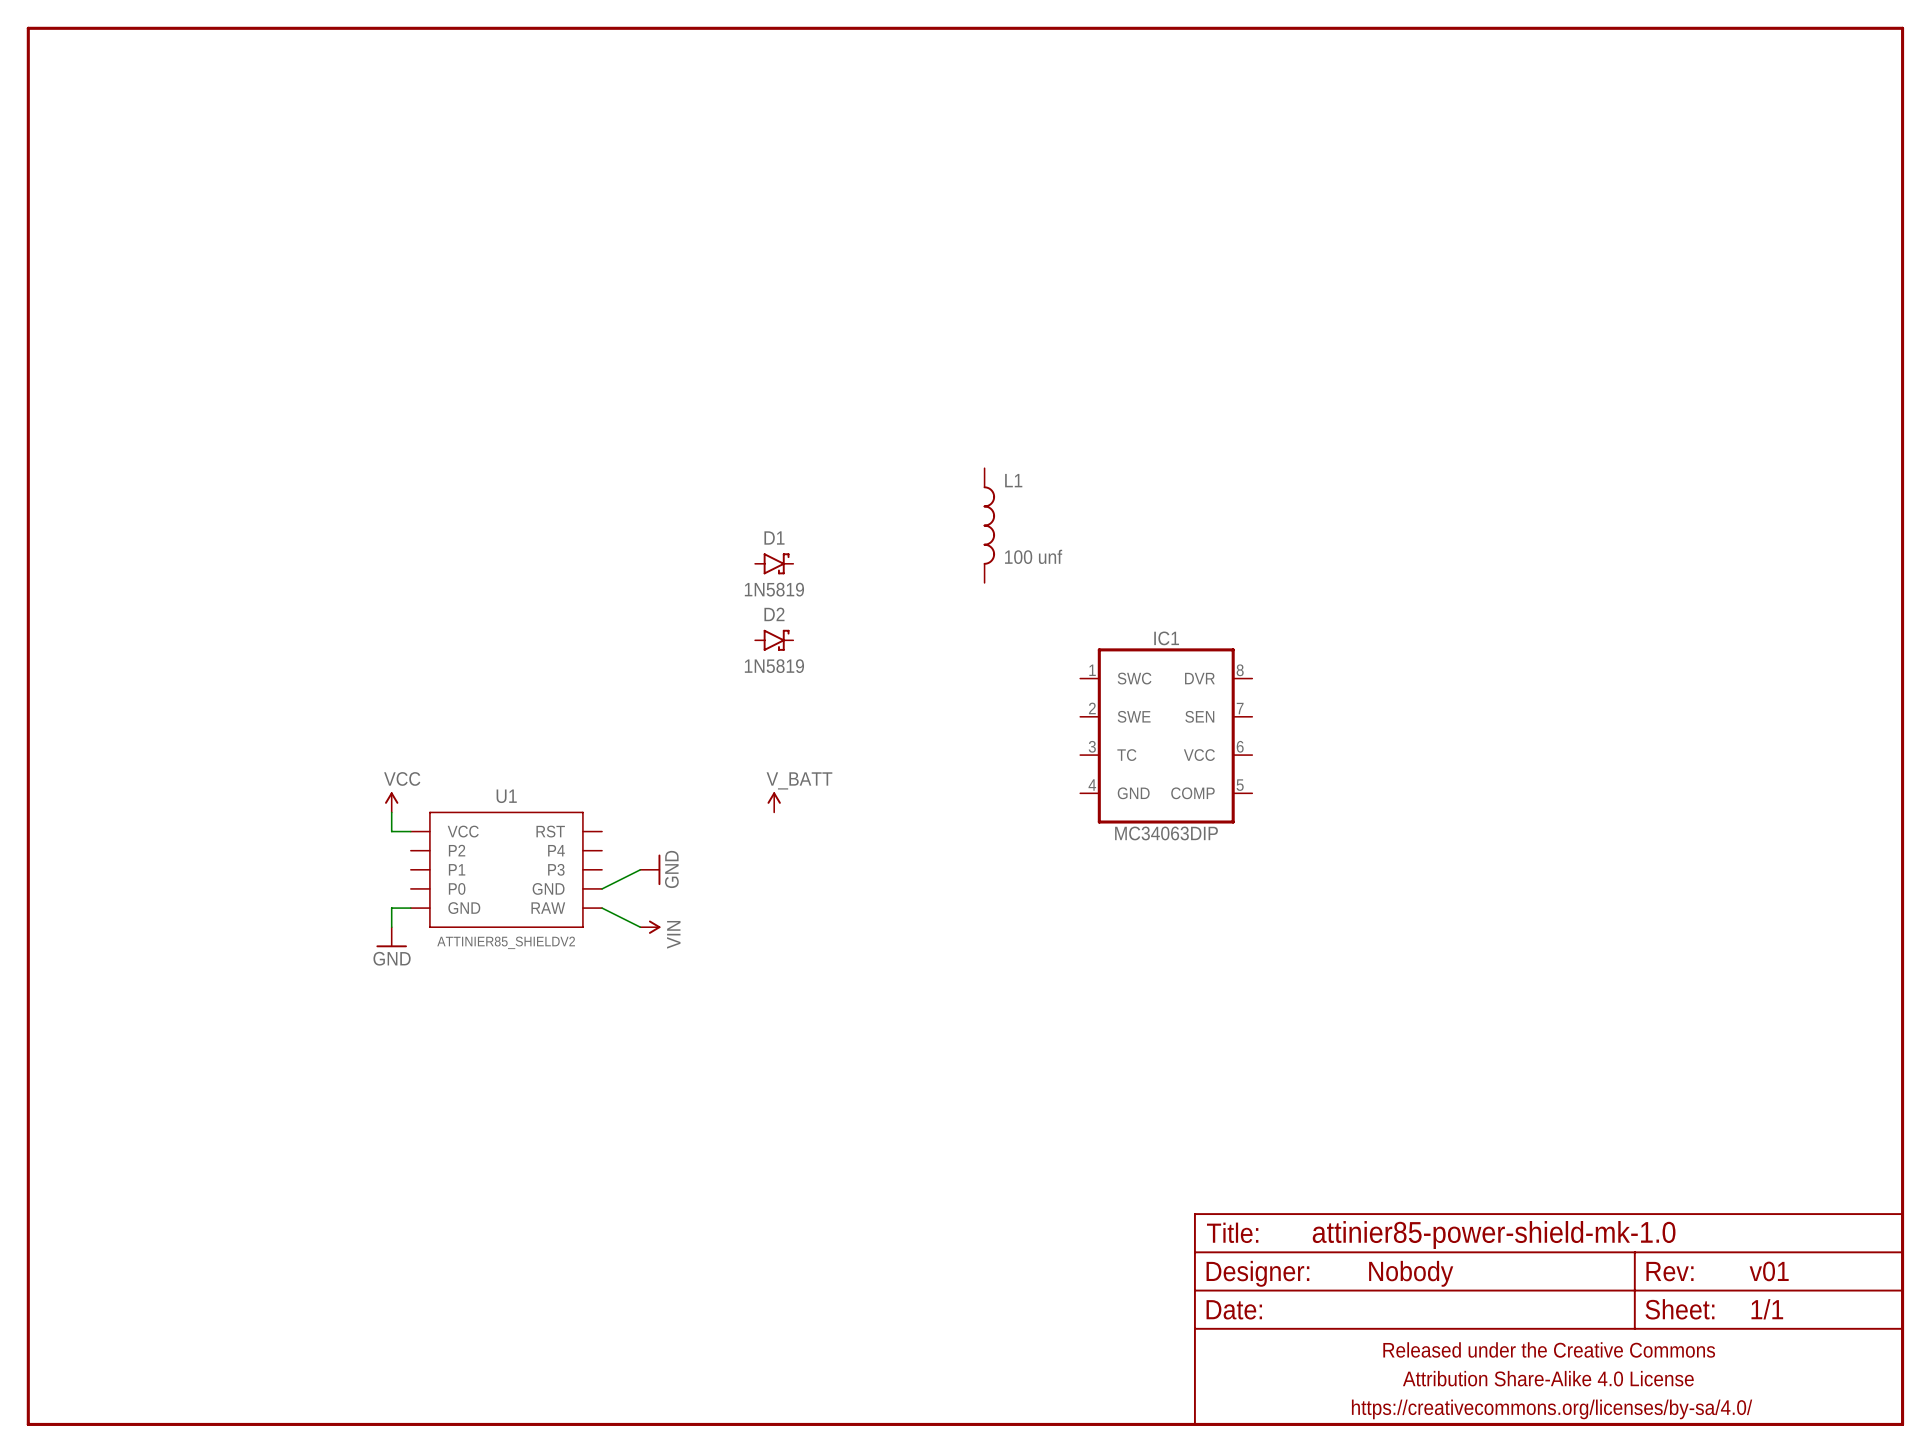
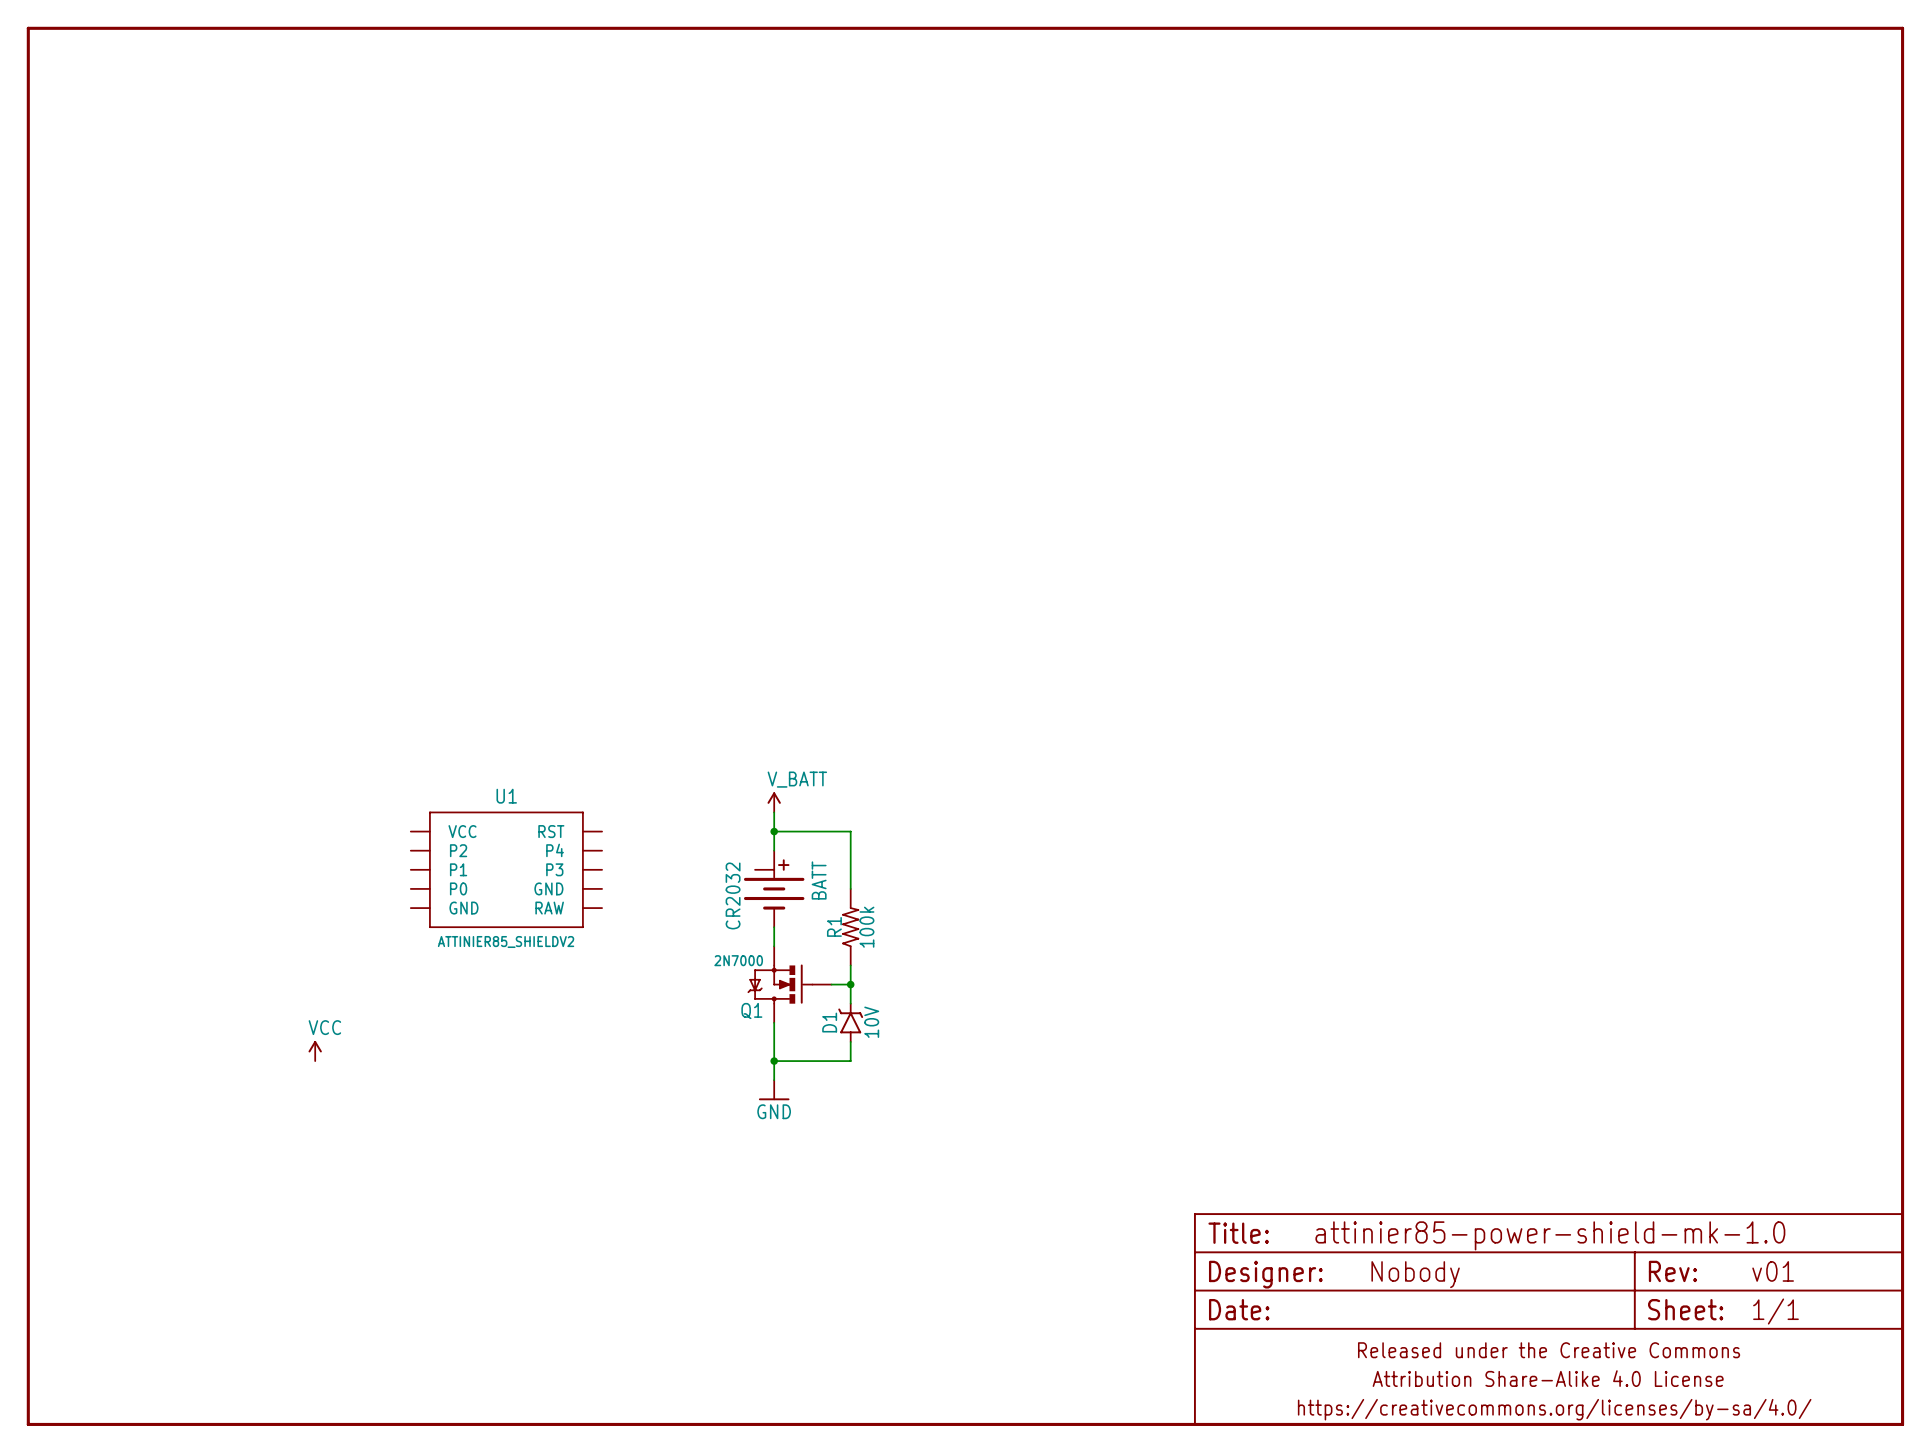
L1: 100 unf (989, 525) -> none
D1 name position: D1 (774, 538) -> D1 (829, 1022)
D1 symbol: [754, 553, 794, 575] -> [838, 1003, 864, 1043]
D1 value: 1N5819 (774, 589) -> 10V (871, 1022)
D2: 1N5819 (774, 640) -> none
IC1: MC34063DIP (1166, 735) -> none
power symbol: VCC (391, 802) -> none
wire: (391, 812) (391, 831) (410, 831) -> none
wire: none -> (774, 812) (774, 850)
wire: none -> (774, 831) (850, 831) (850, 888)
junction: none -> (774, 831)
wire: (640, 869) (602, 888) -> none
power symbol: GND (650, 869) -> none
BATT: none -> CR2032 (774, 888)
wire: (410, 908) (391, 908) (391, 927) -> none
wire: (602, 908) (640, 927) -> none
power symbol: VIN (650, 927) -> none
wire: none -> (774, 927) (774, 946)
R1: none -> 100k (850, 927)
power symbol: GND (391, 937) -> none
wire: none -> (850, 965) (850, 1003)
Q1: none -> 2N7000 (789, 984)
wire: none -> (831, 984) (850, 984)
junction: none -> (850, 984)
wire: none -> (774, 1022) (774, 1080)
wire: none -> (850, 1041) (850, 1061) (774, 1061)
power symbol: none -> VCC (315, 1051)
junction: none -> (774, 1061)
power symbol: none -> GND (774, 1090)

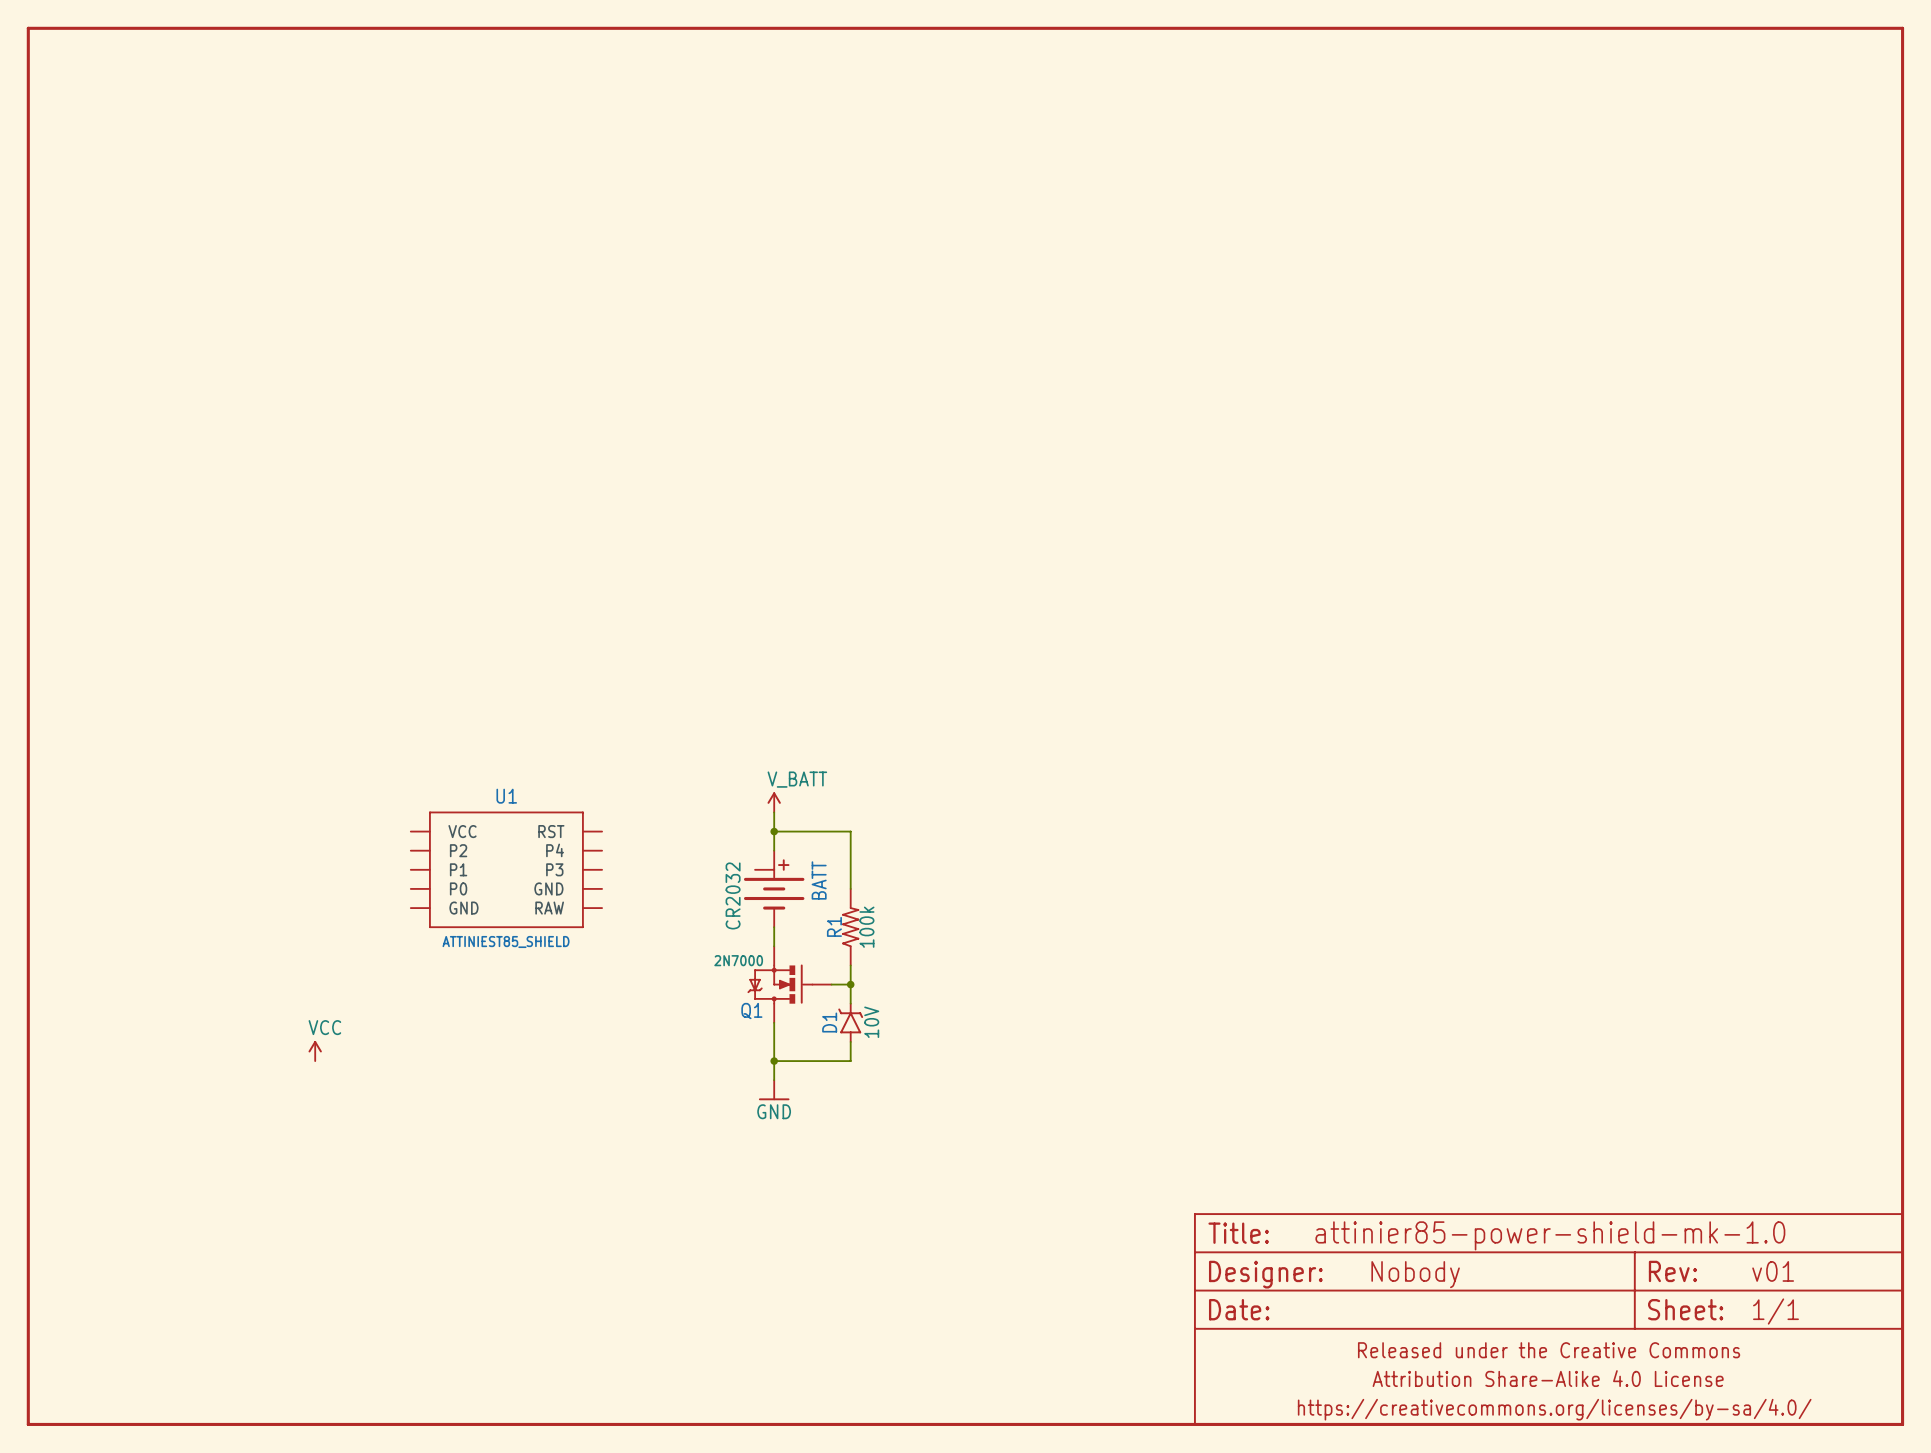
U1 value: ATTINIER85_SHIELDV2 (506, 941) -> ATTINIEST85_SHIELD (506, 941)

